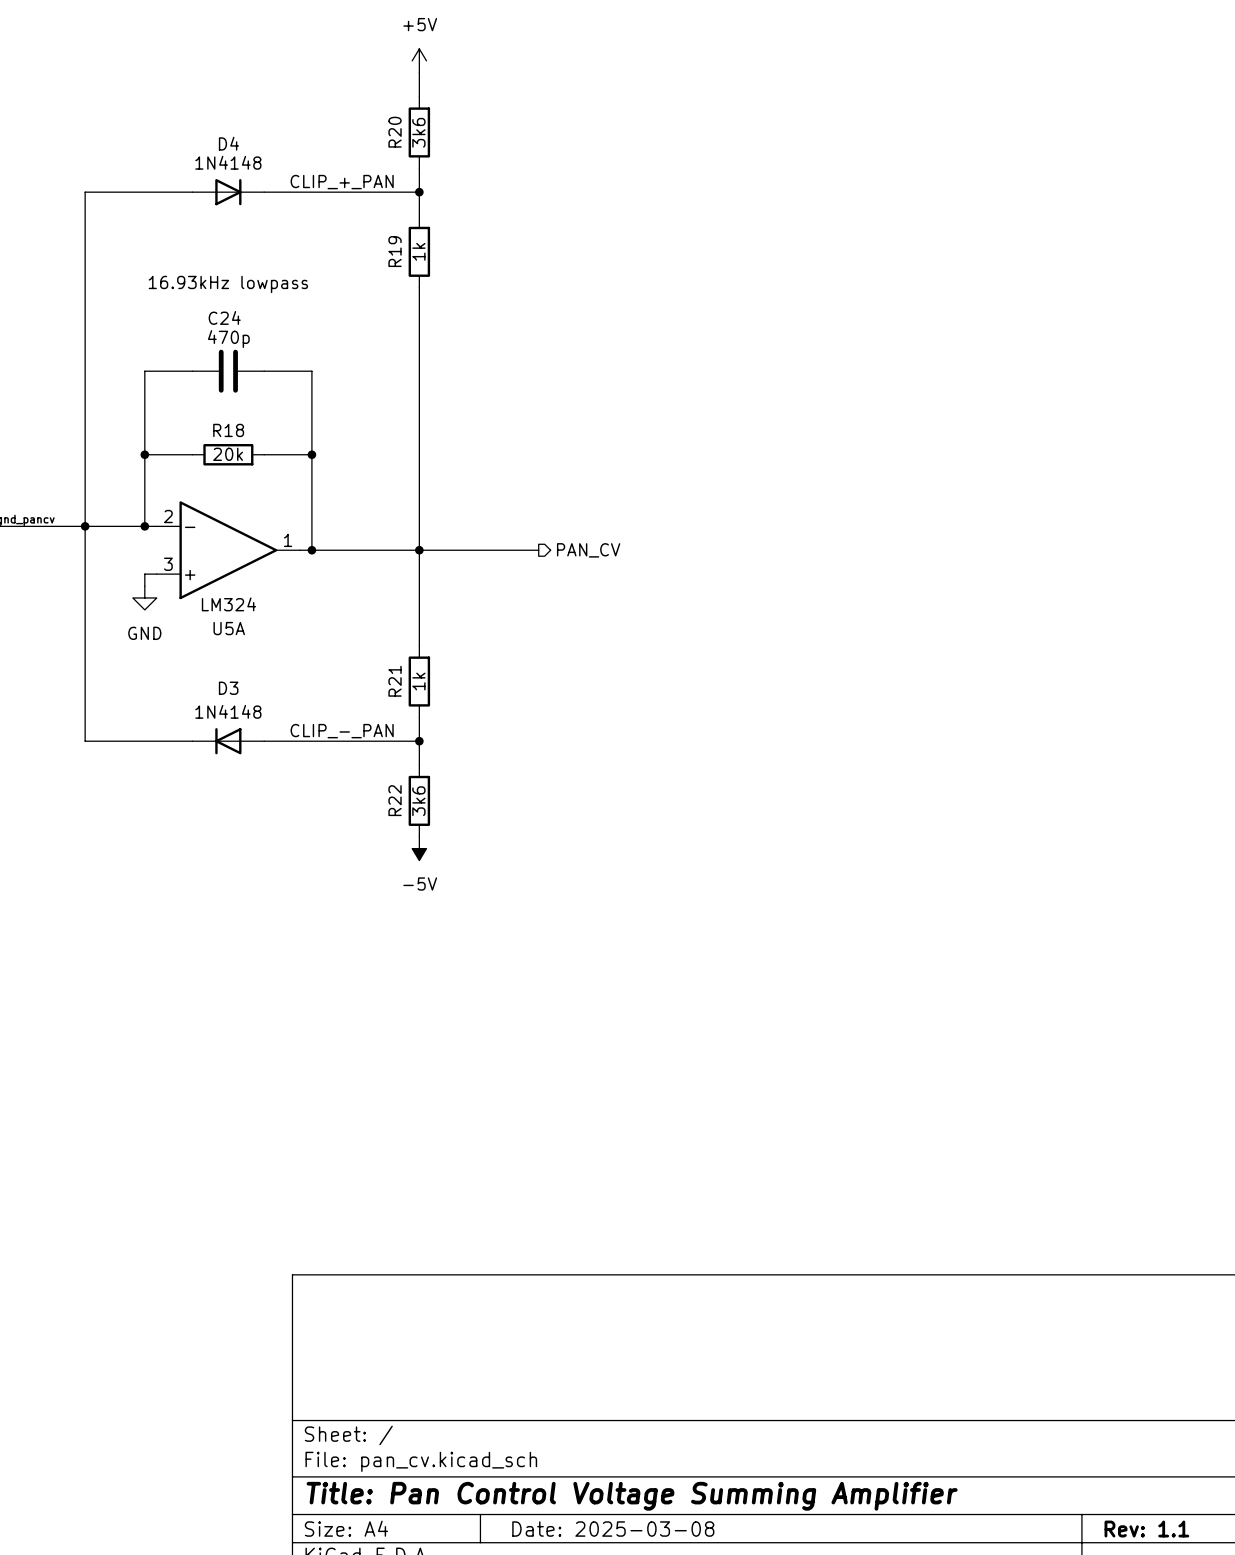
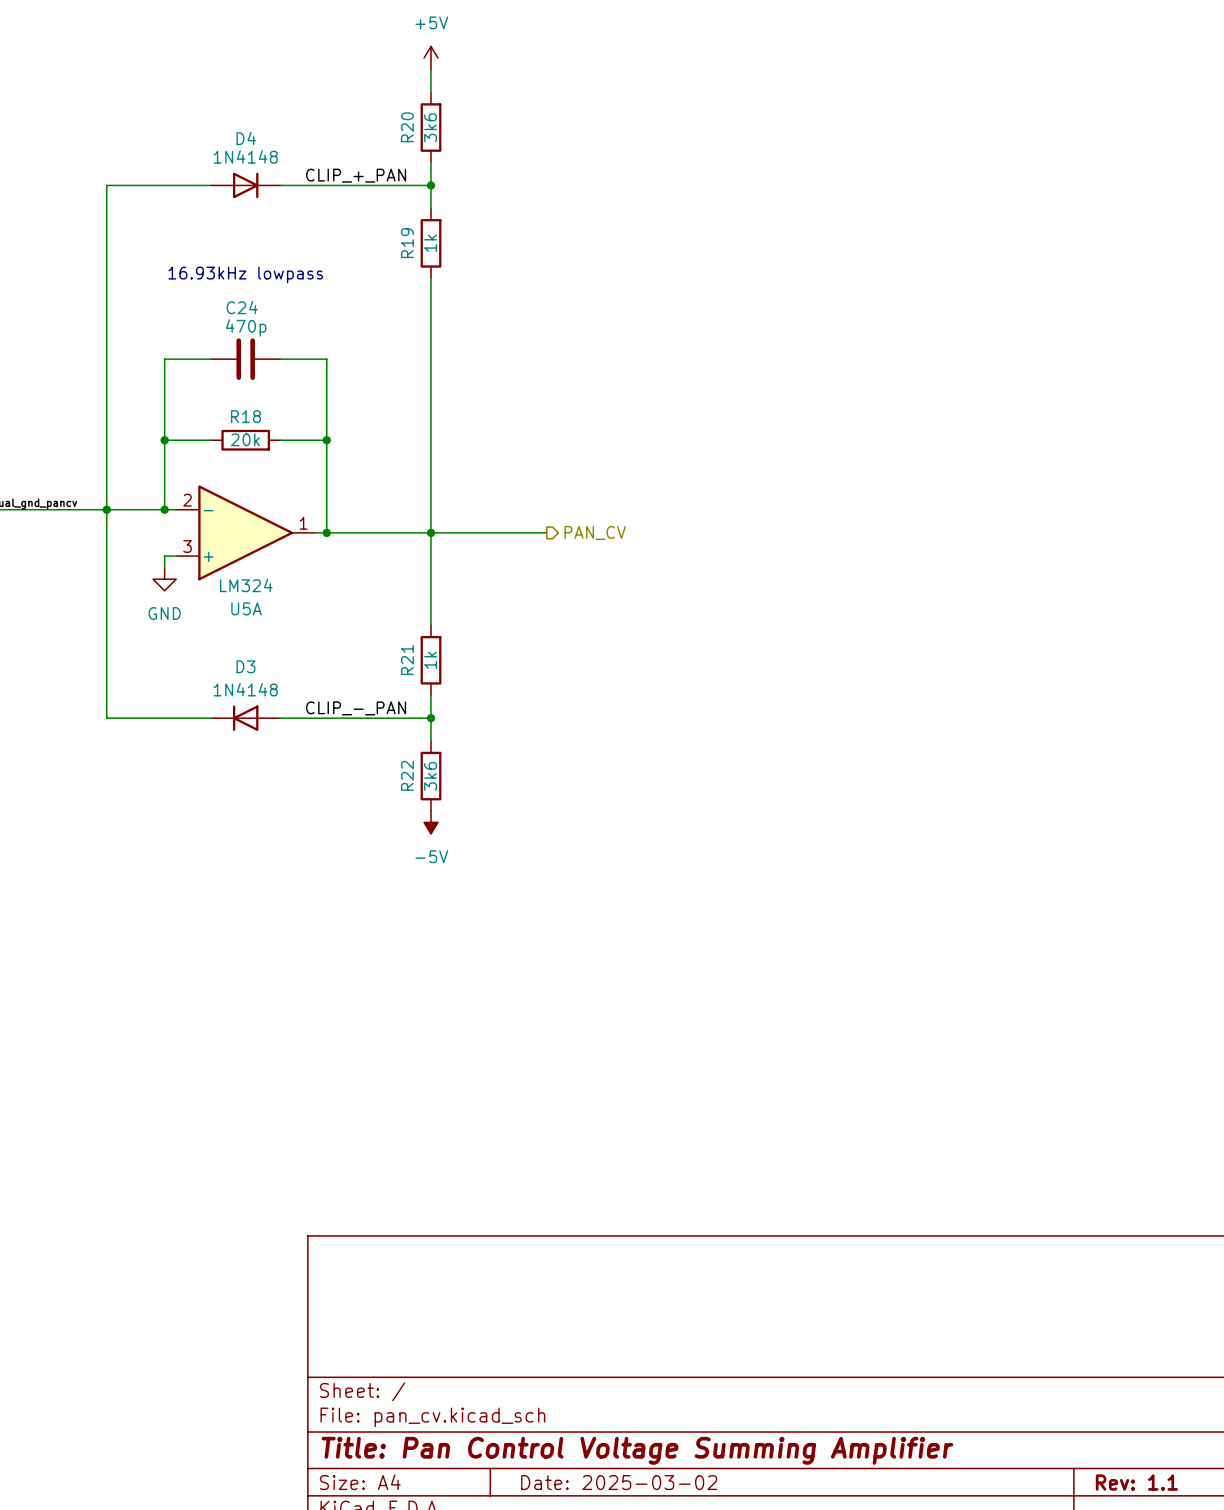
title block: Date: 2025-03-08 (613, 1529) -> Date: 2025-03-02 (619, 1482)

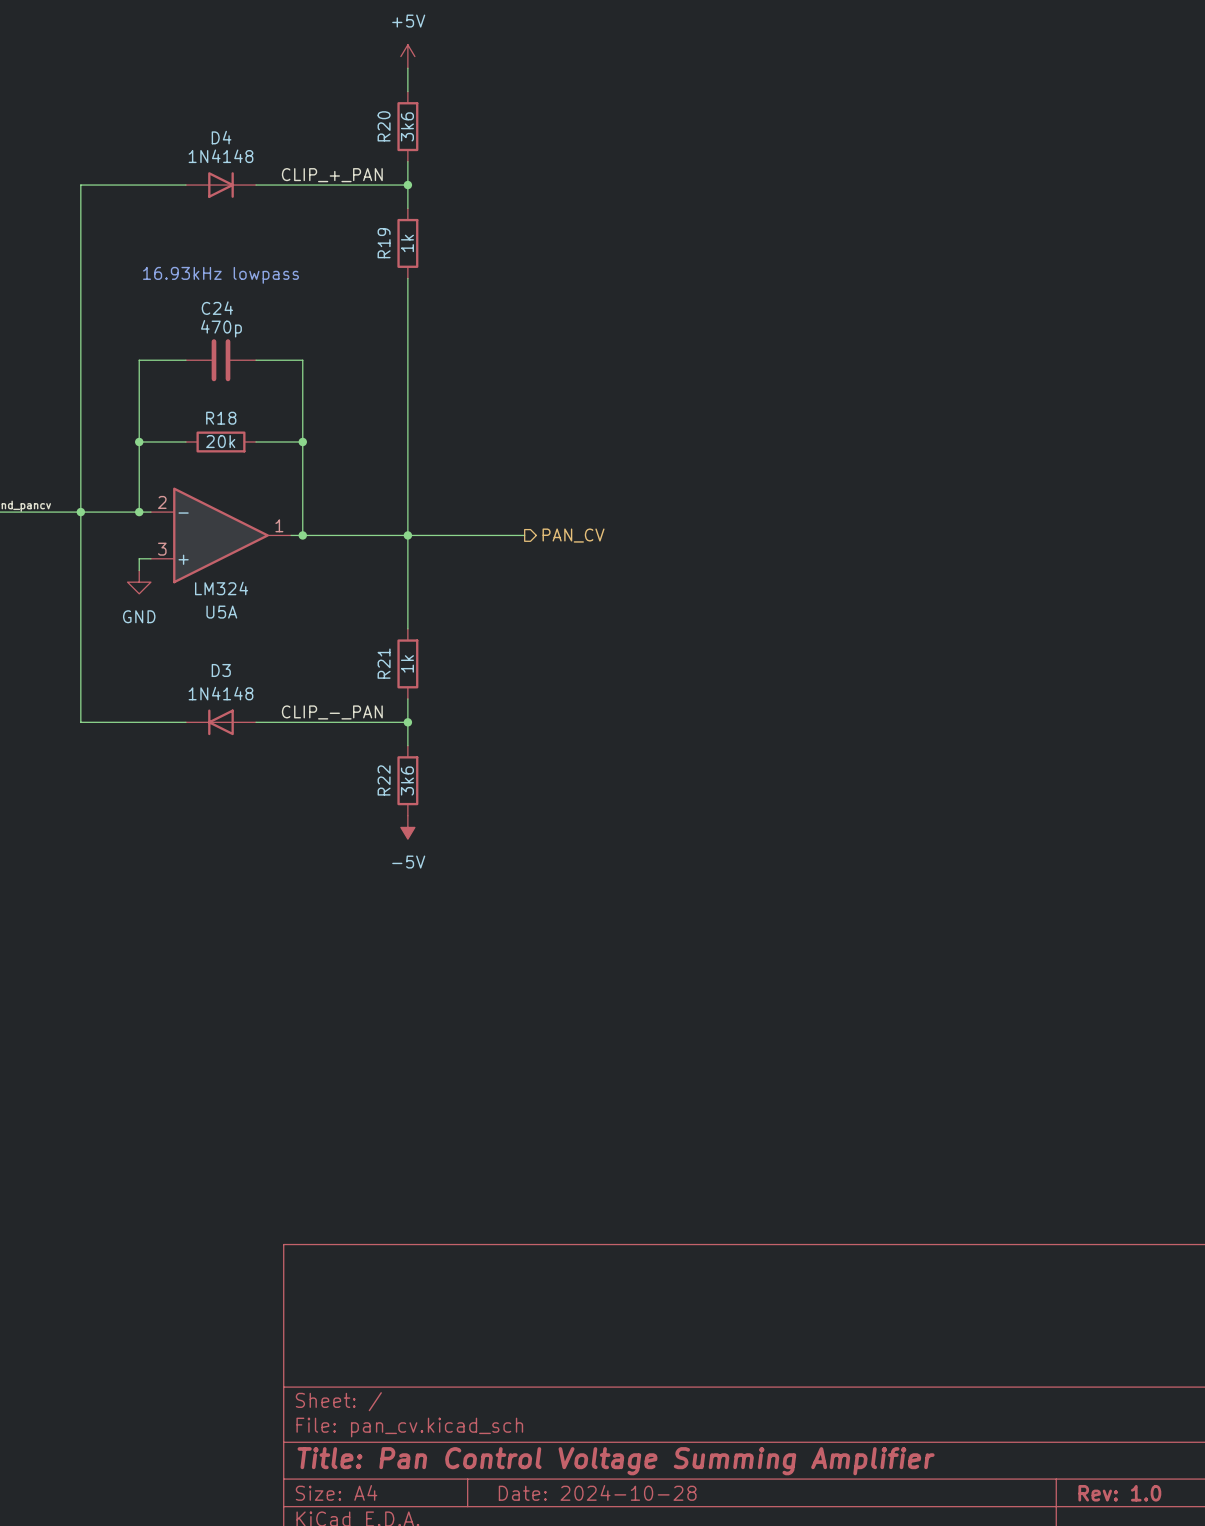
title block: Date: 2025-03-02 (619, 1482) -> Date: 2024-10-28 (597, 1492)
title block: Rev: 1.1 (1136, 1482) -> Rev: 1.0 (1119, 1493)

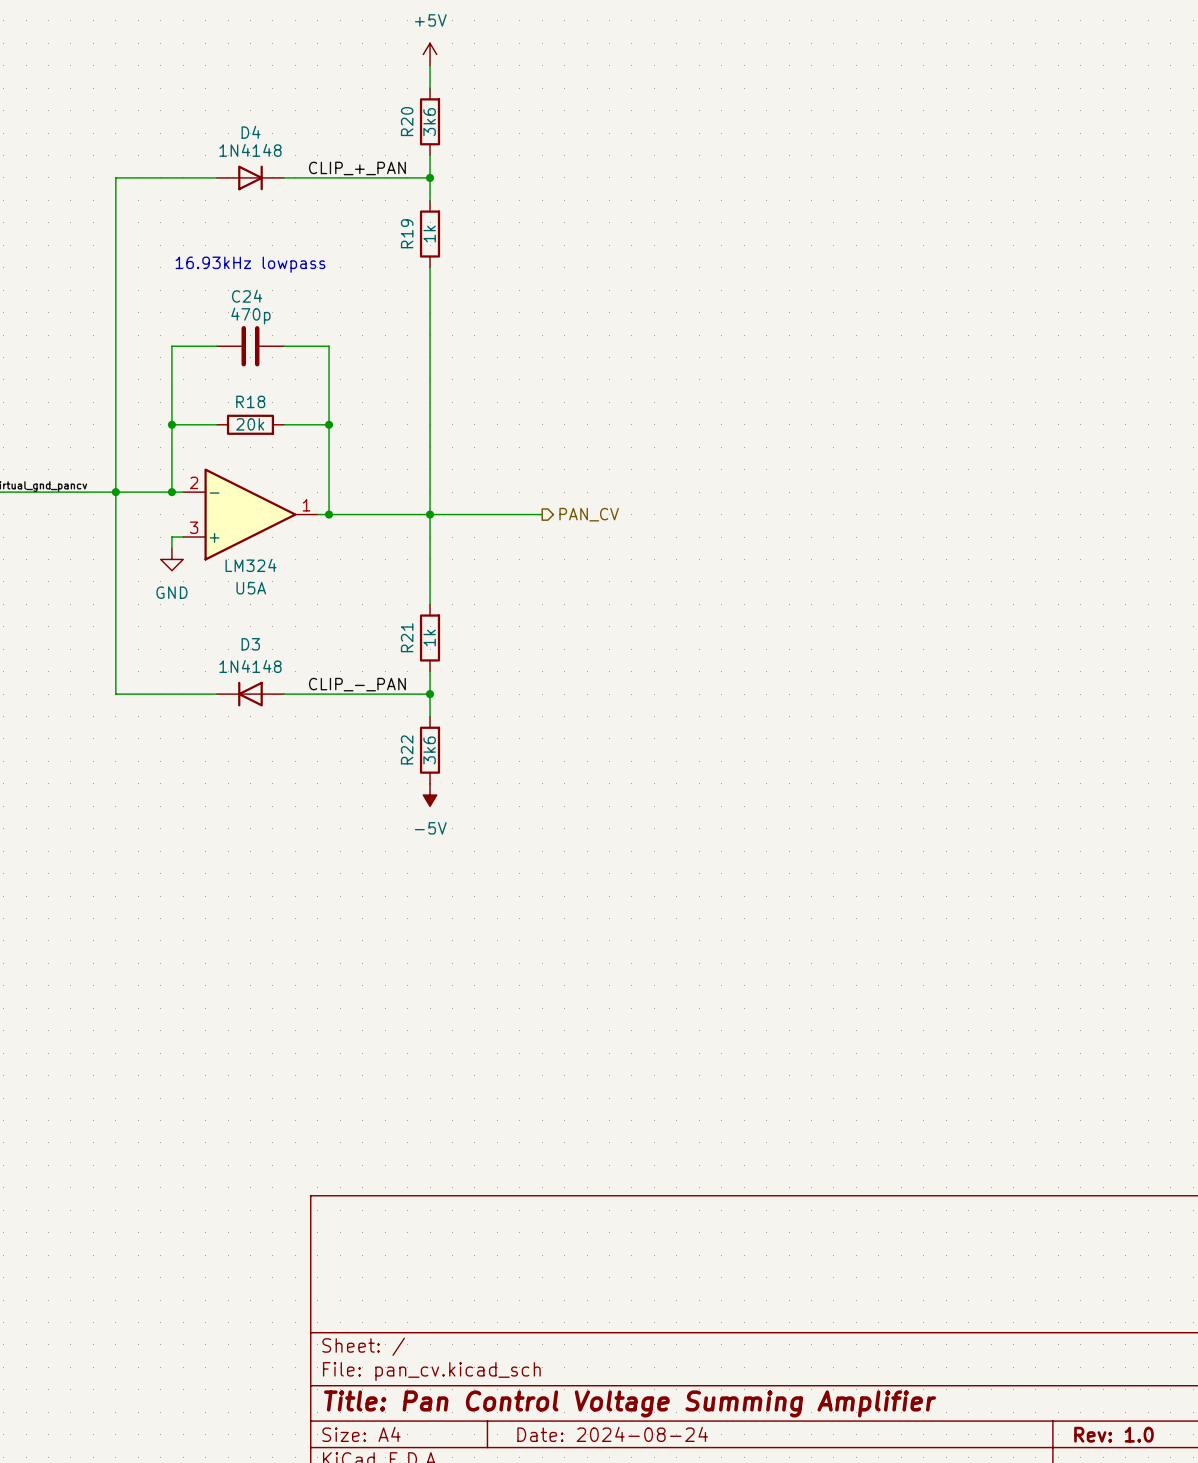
title block: Date: 2024-10-28 (597, 1492) -> Date: 2024-08-24 (612, 1434)

